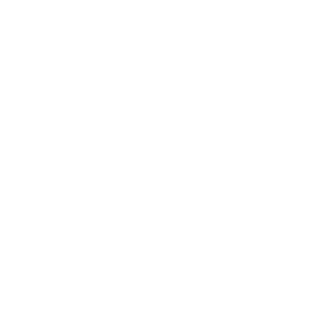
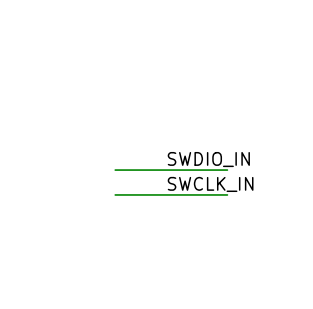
label: none -> SWDIO_IN (208, 159)
wire: none -> (115, 170) (227, 170)
label: none -> SWCLK_IN (210, 184)
wire: none -> (115, 194) (227, 194)

